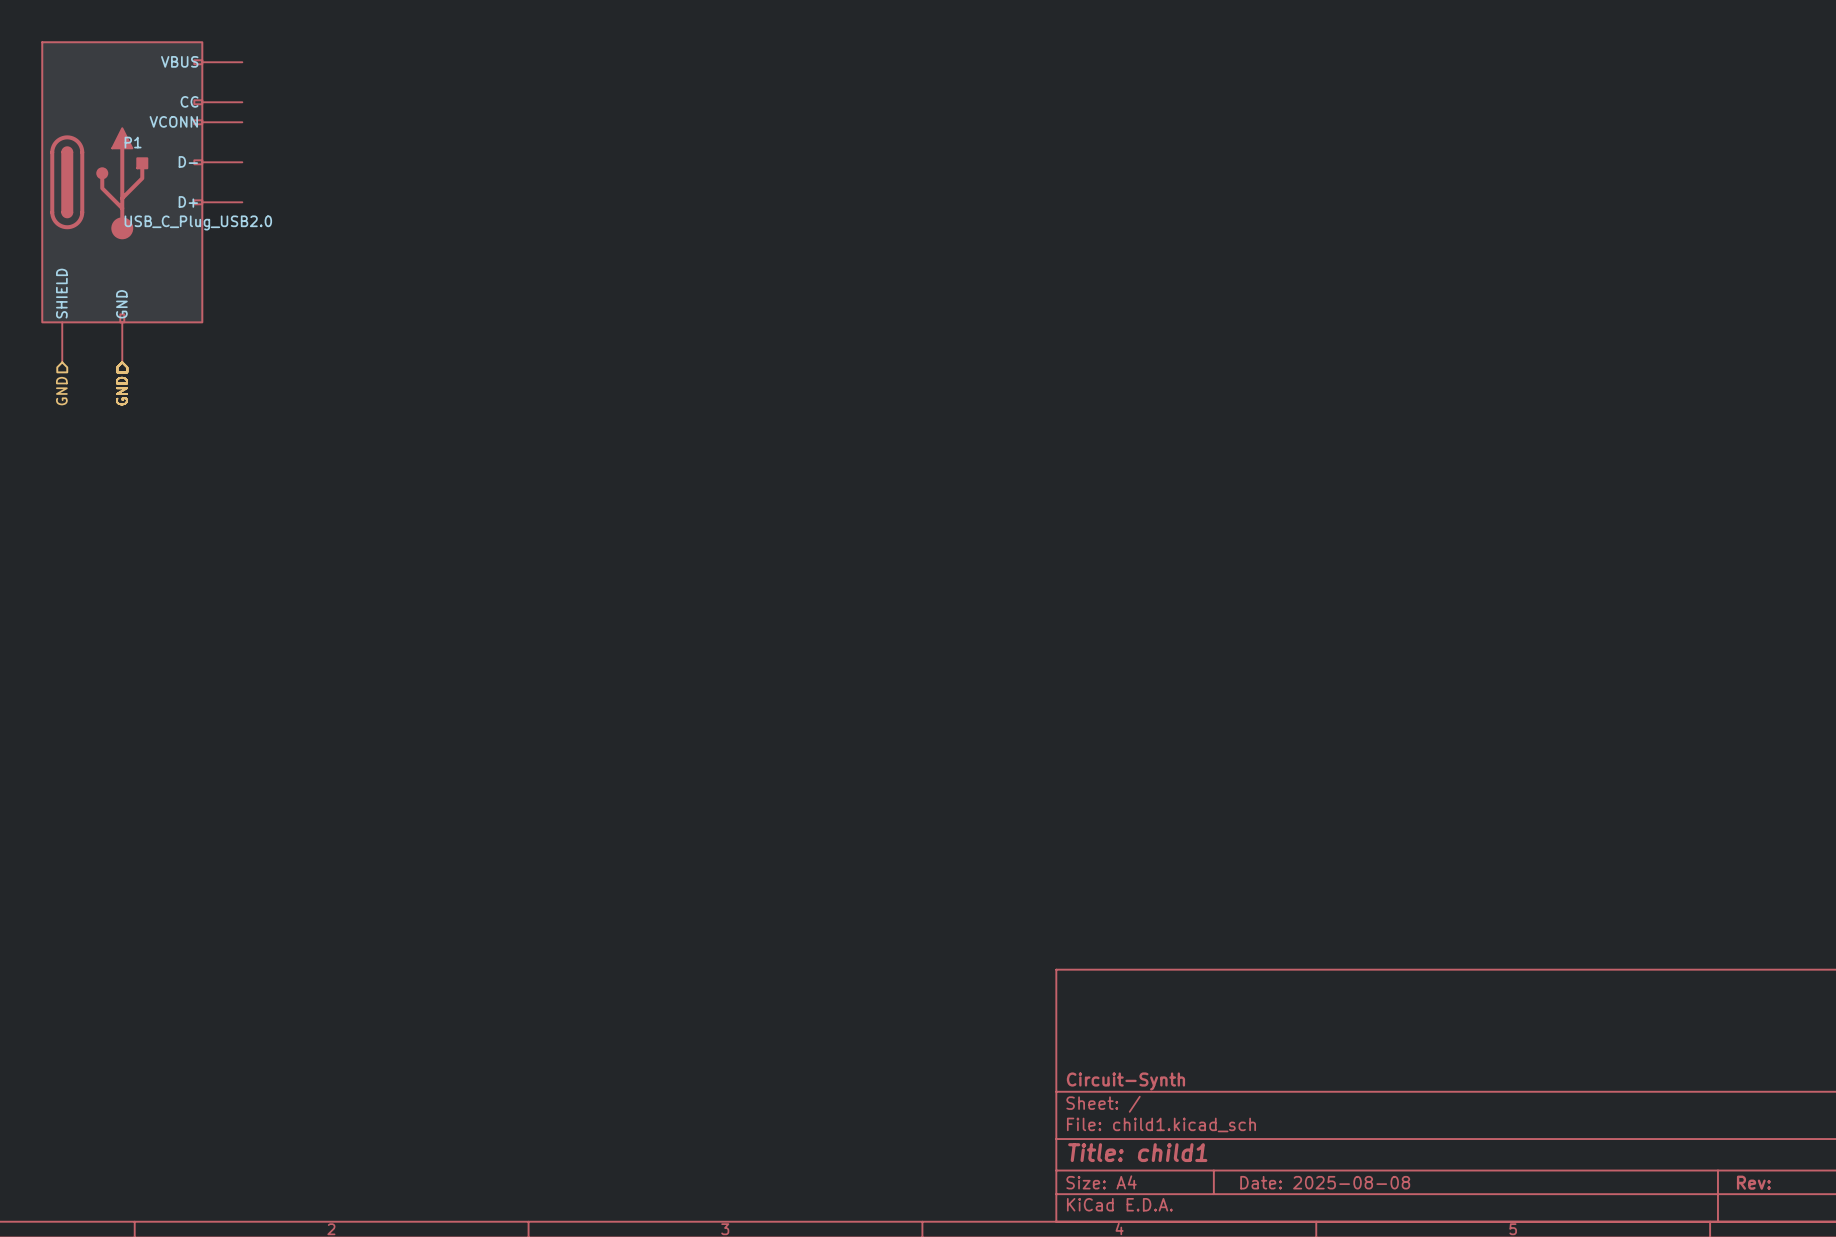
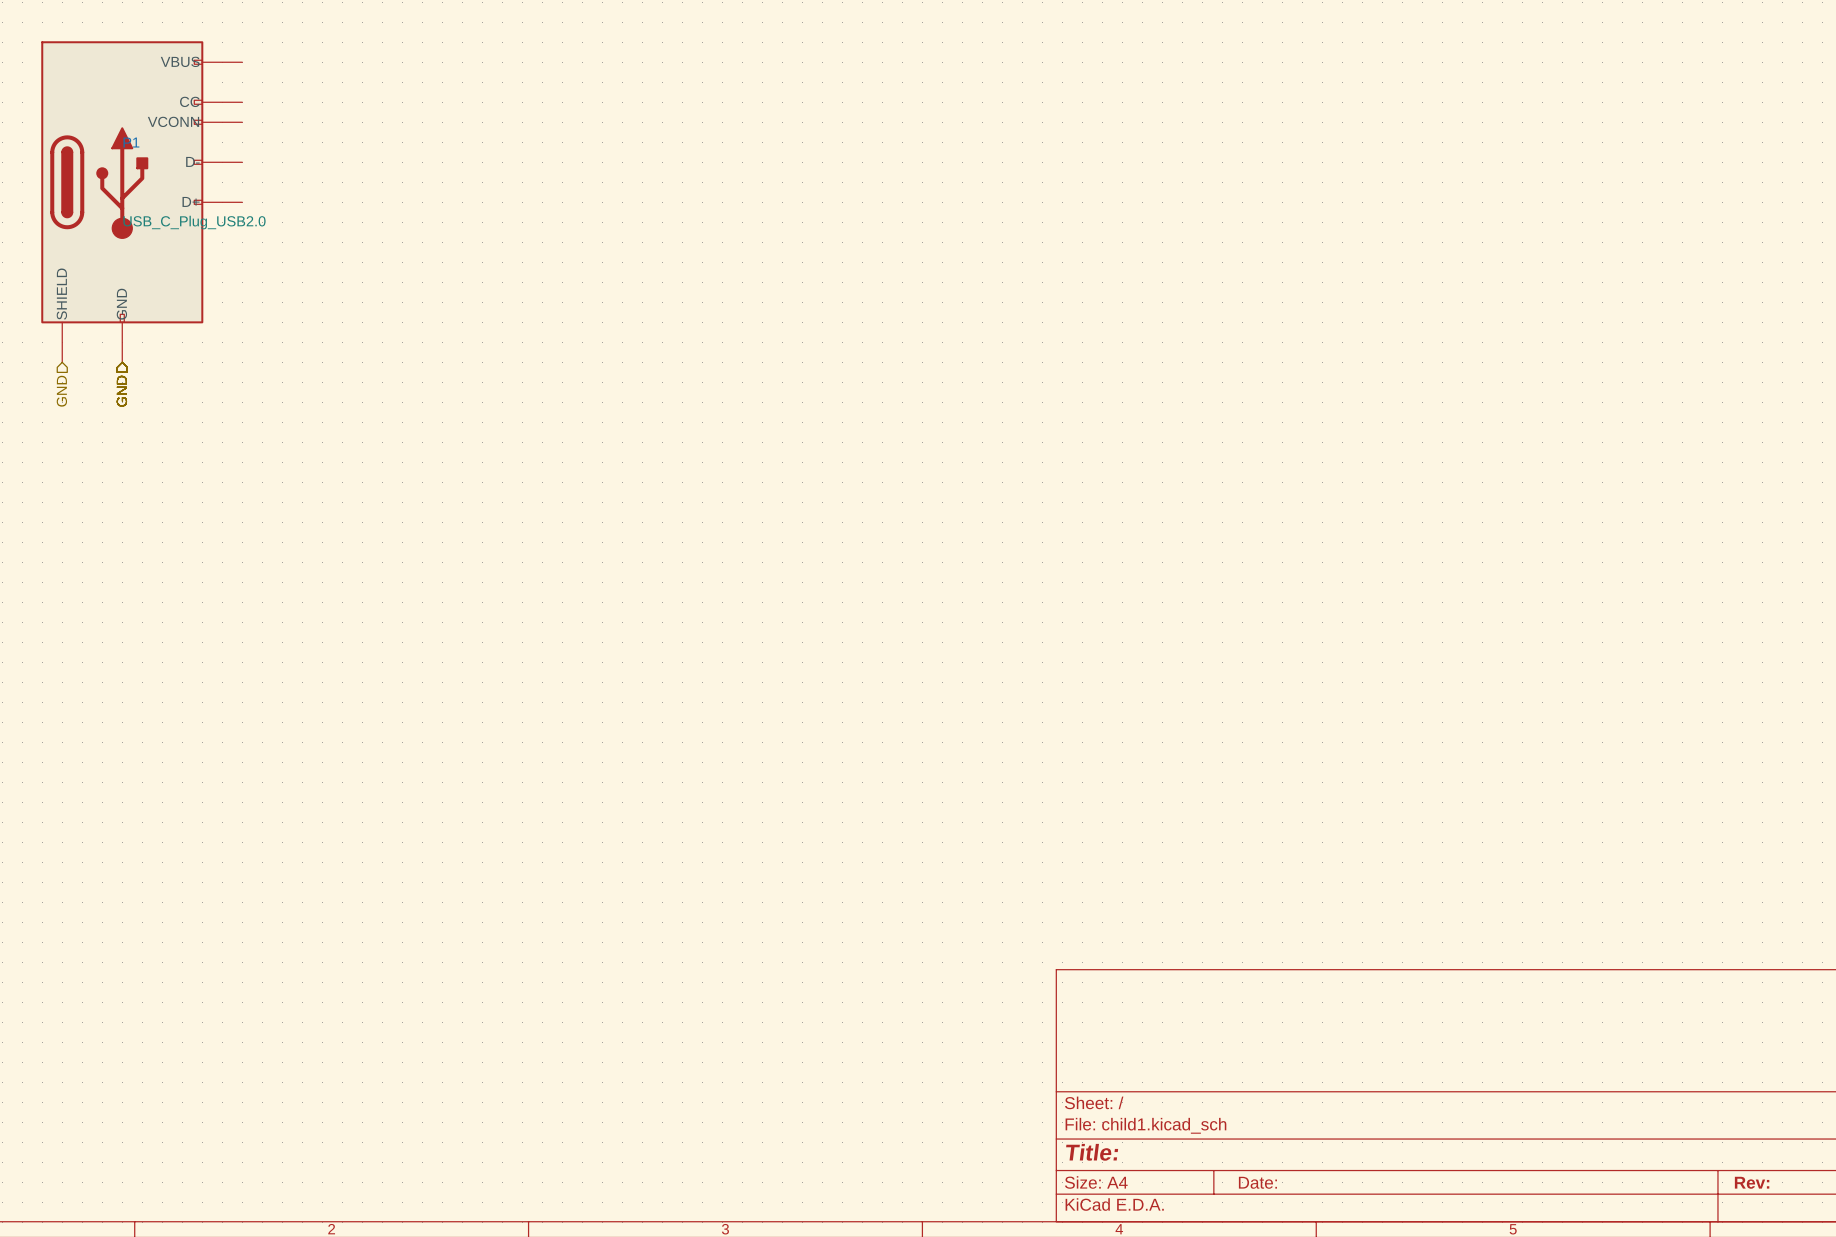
title block: Circuit-Synth (1125, 1081) -> none
title block: Title: child1 (1137, 1152) -> Title: (1092, 1152)
title block: Date: 2025-08-08 (1325, 1182) -> Date: (1257, 1182)

